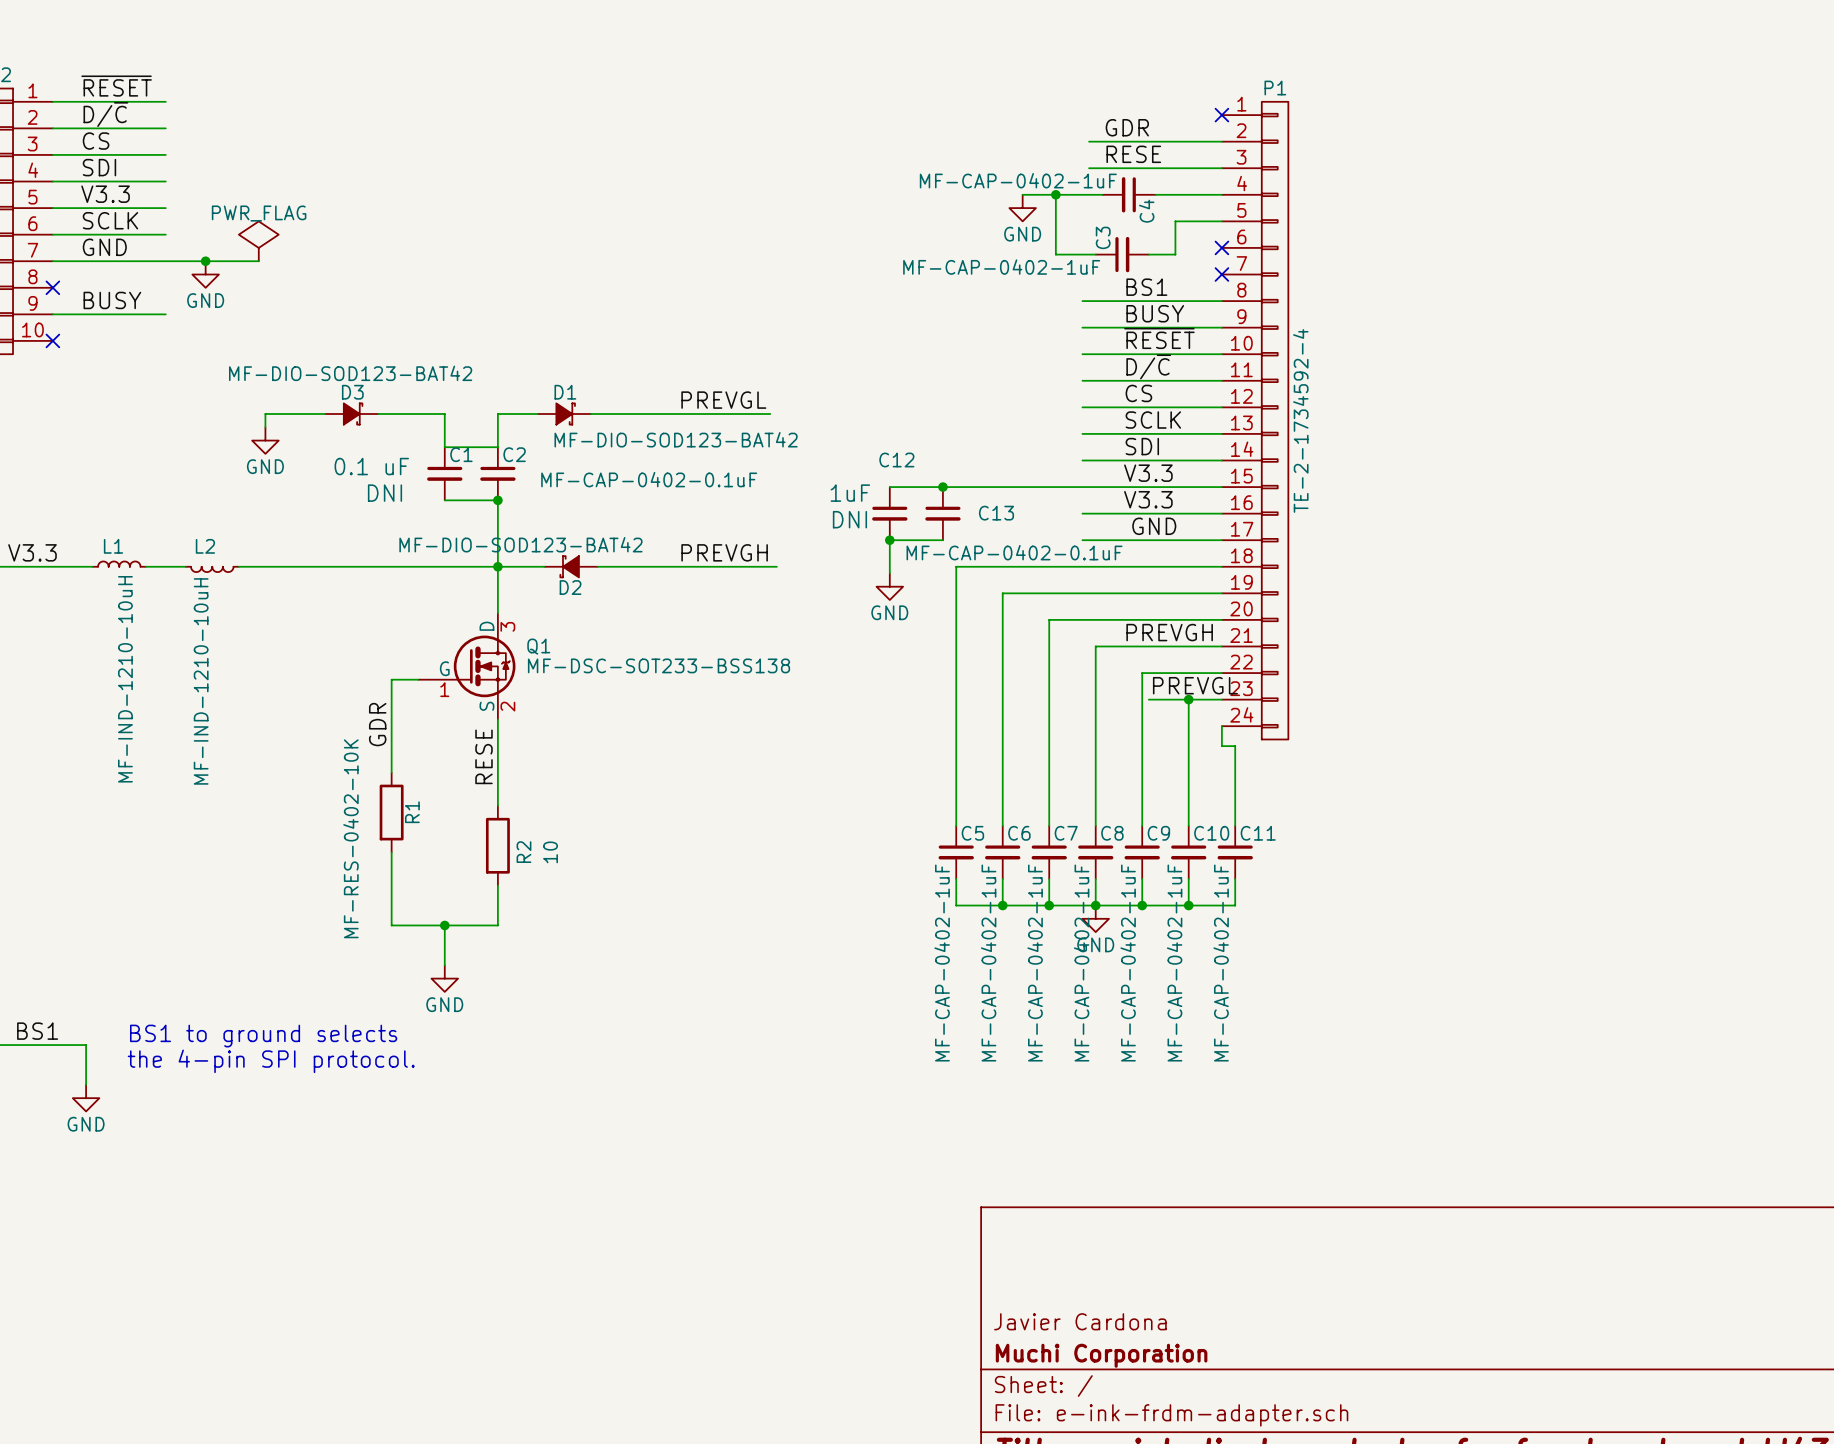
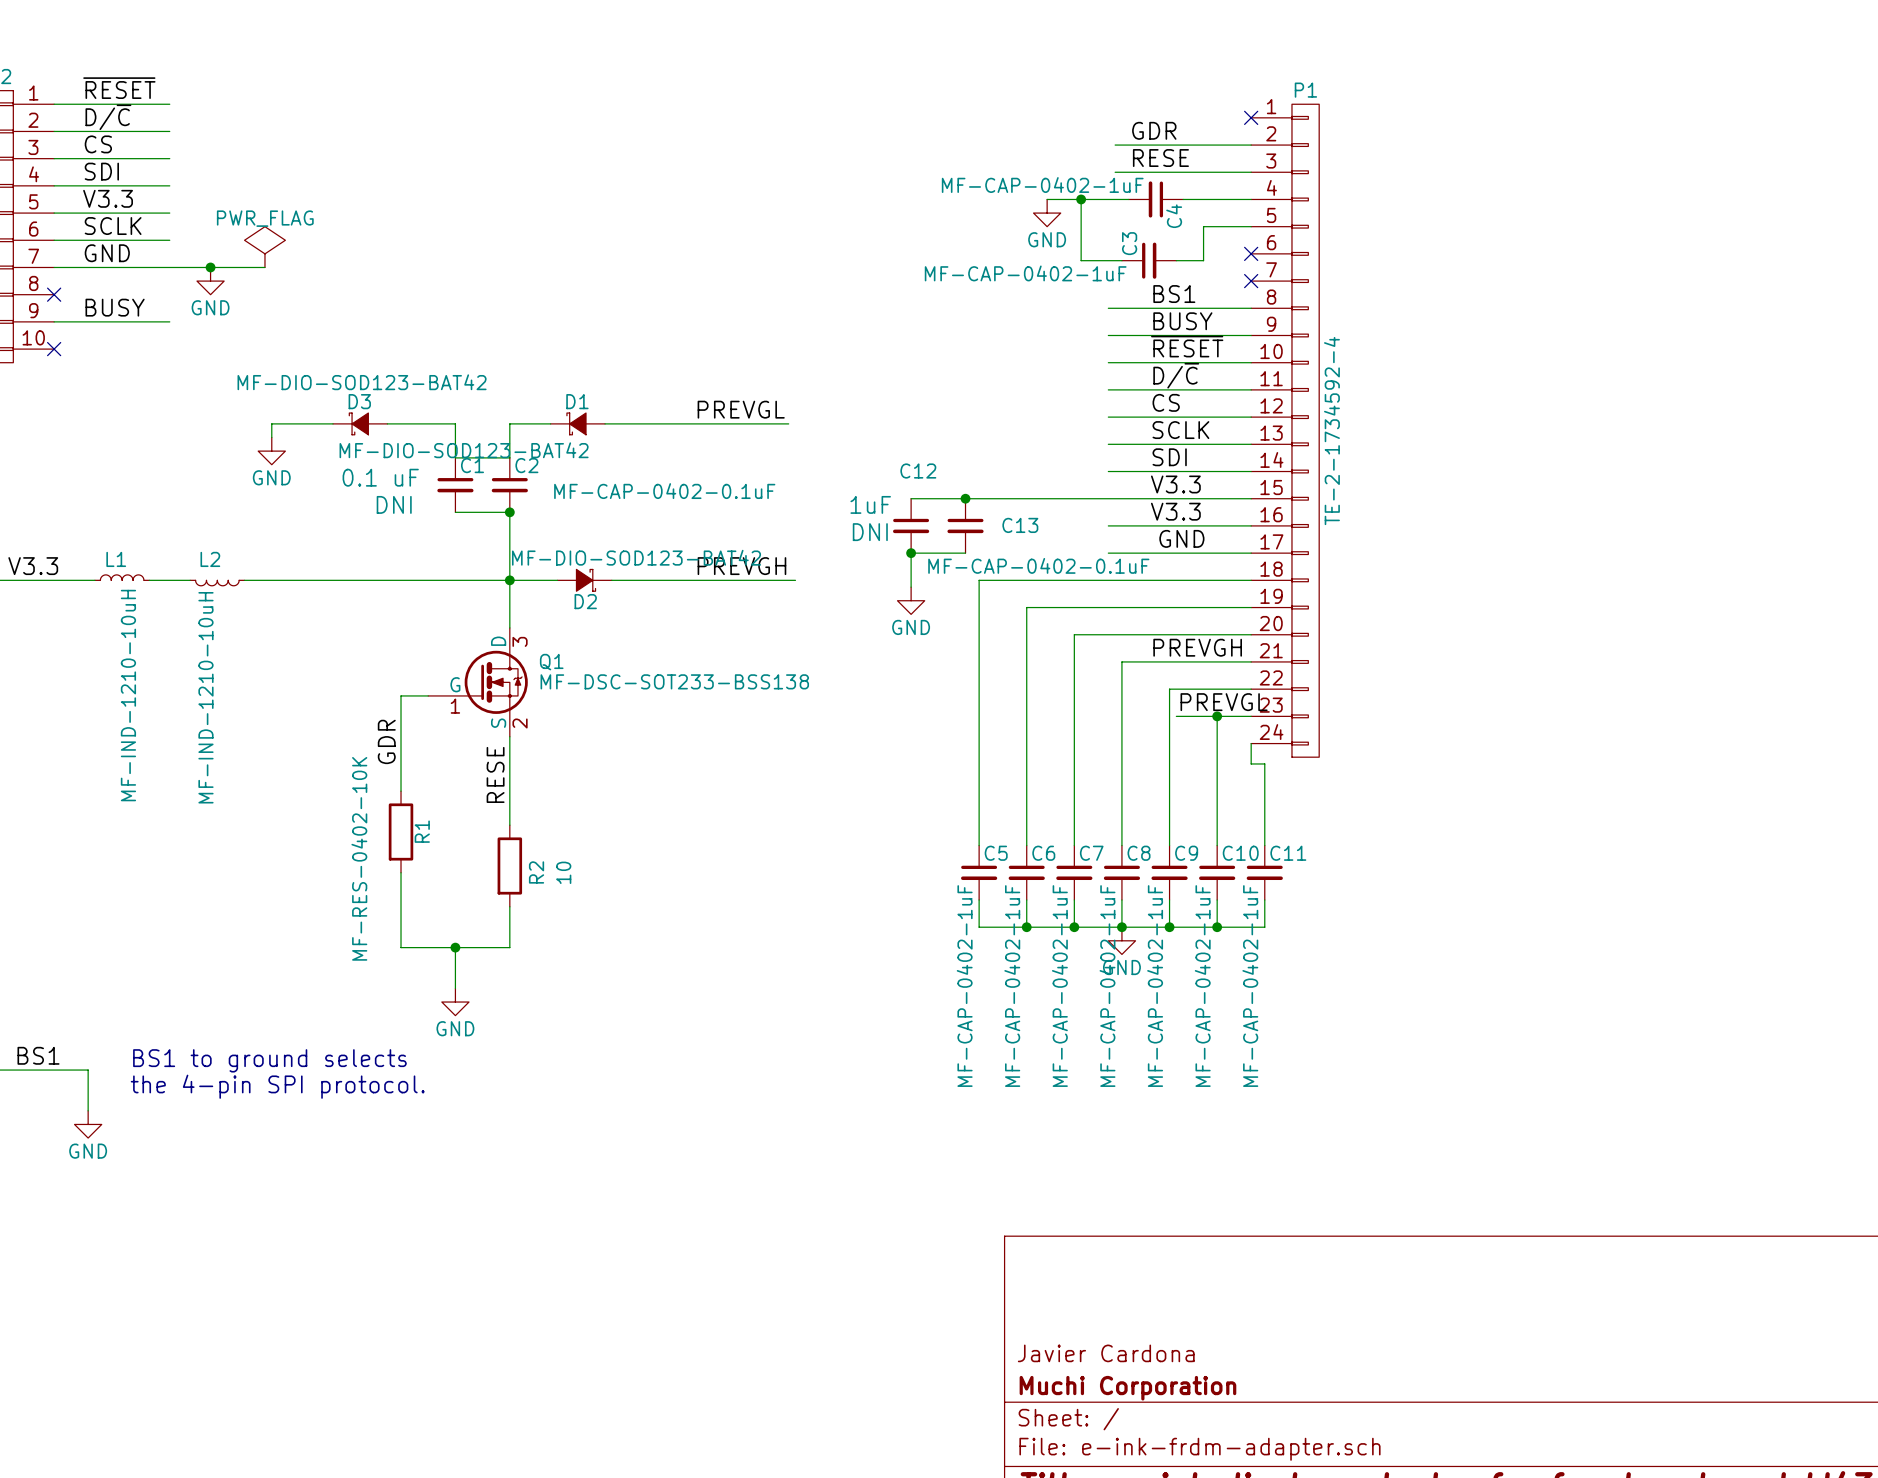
D3 flip: as is (353, 414) -> left-right (358, 423)
D1 flip: as is (565, 414) -> left-right (576, 423)
D2 flip: as is (569, 566) -> left-right (586, 580)

